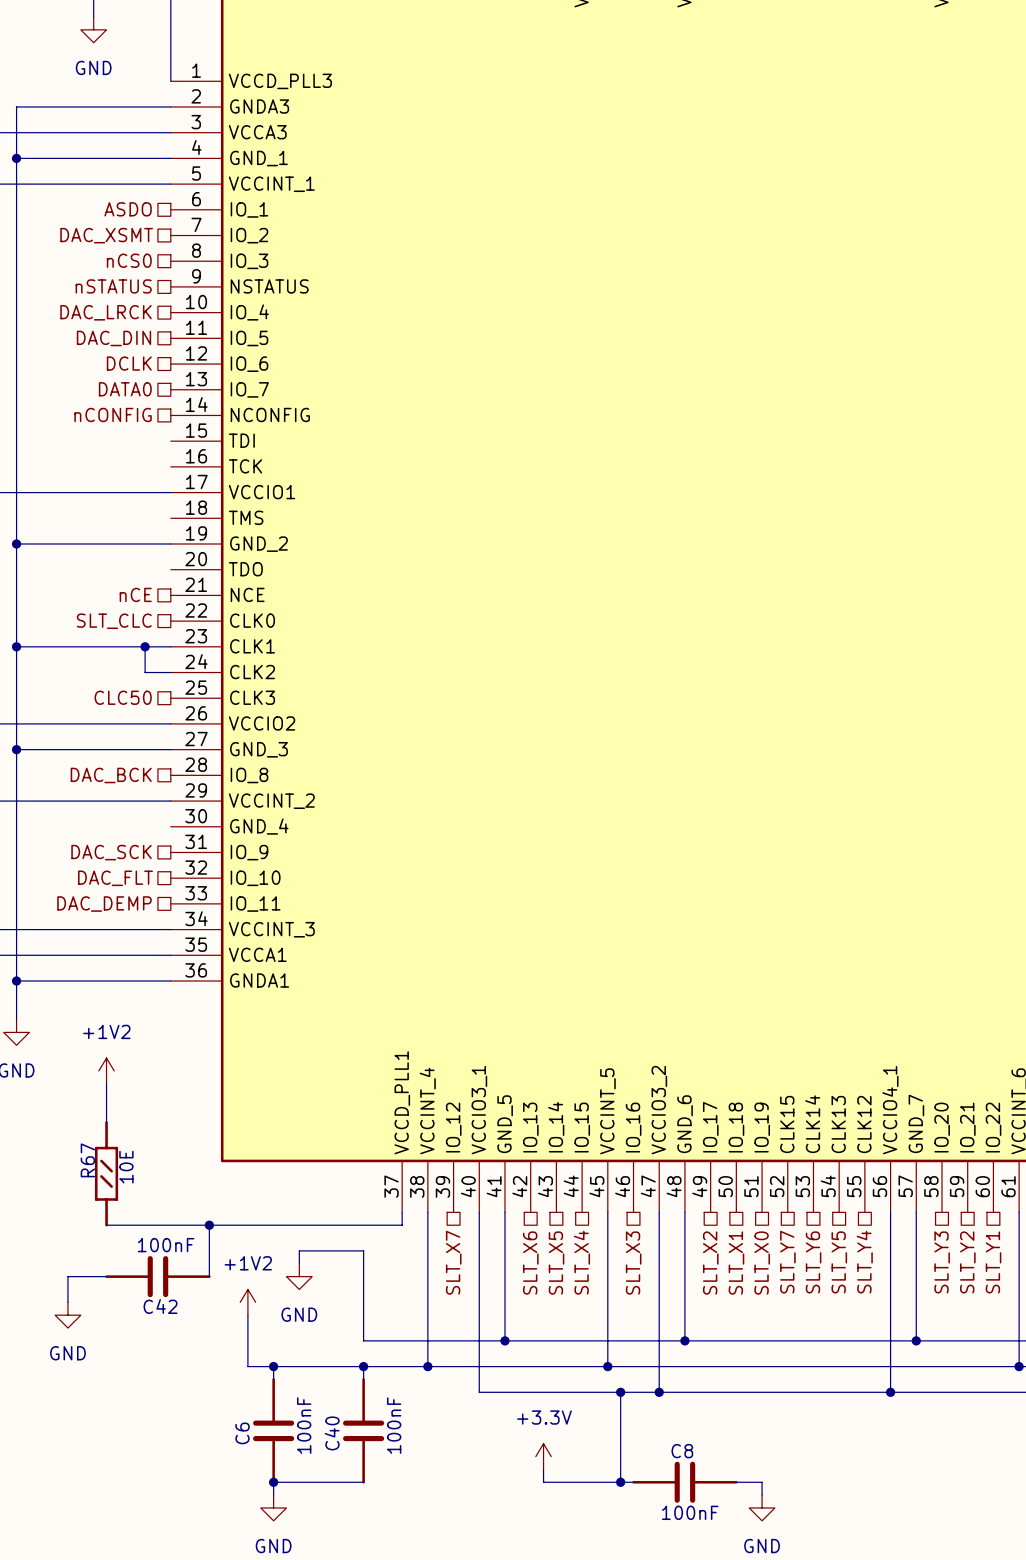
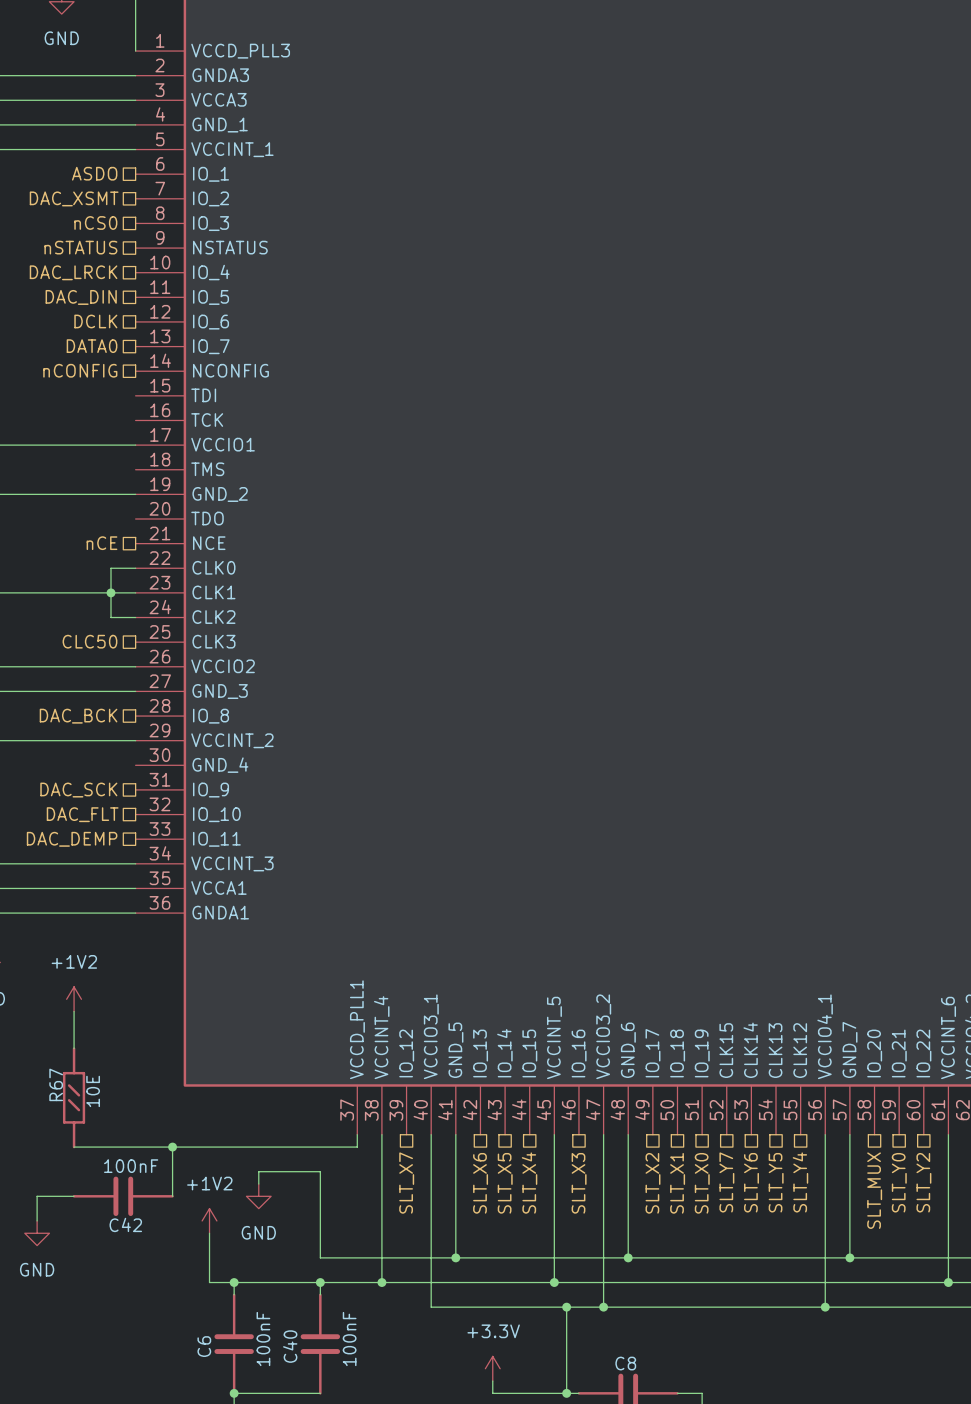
hierarchical label: SLT_CLC (114, 621) -> none
wire: none -> (135, 568) (111, 568) (111, 592)
hierarchical label: SLT_Y3 (942, 1262) -> SLT_MUX (874, 1190)
hierarchical label: SLT_Y2 (967, 1262) -> SLT_Y0 (899, 1182)
hierarchical label: SLT_Y1 (993, 1262) -> SLT_Y2 (923, 1182)

